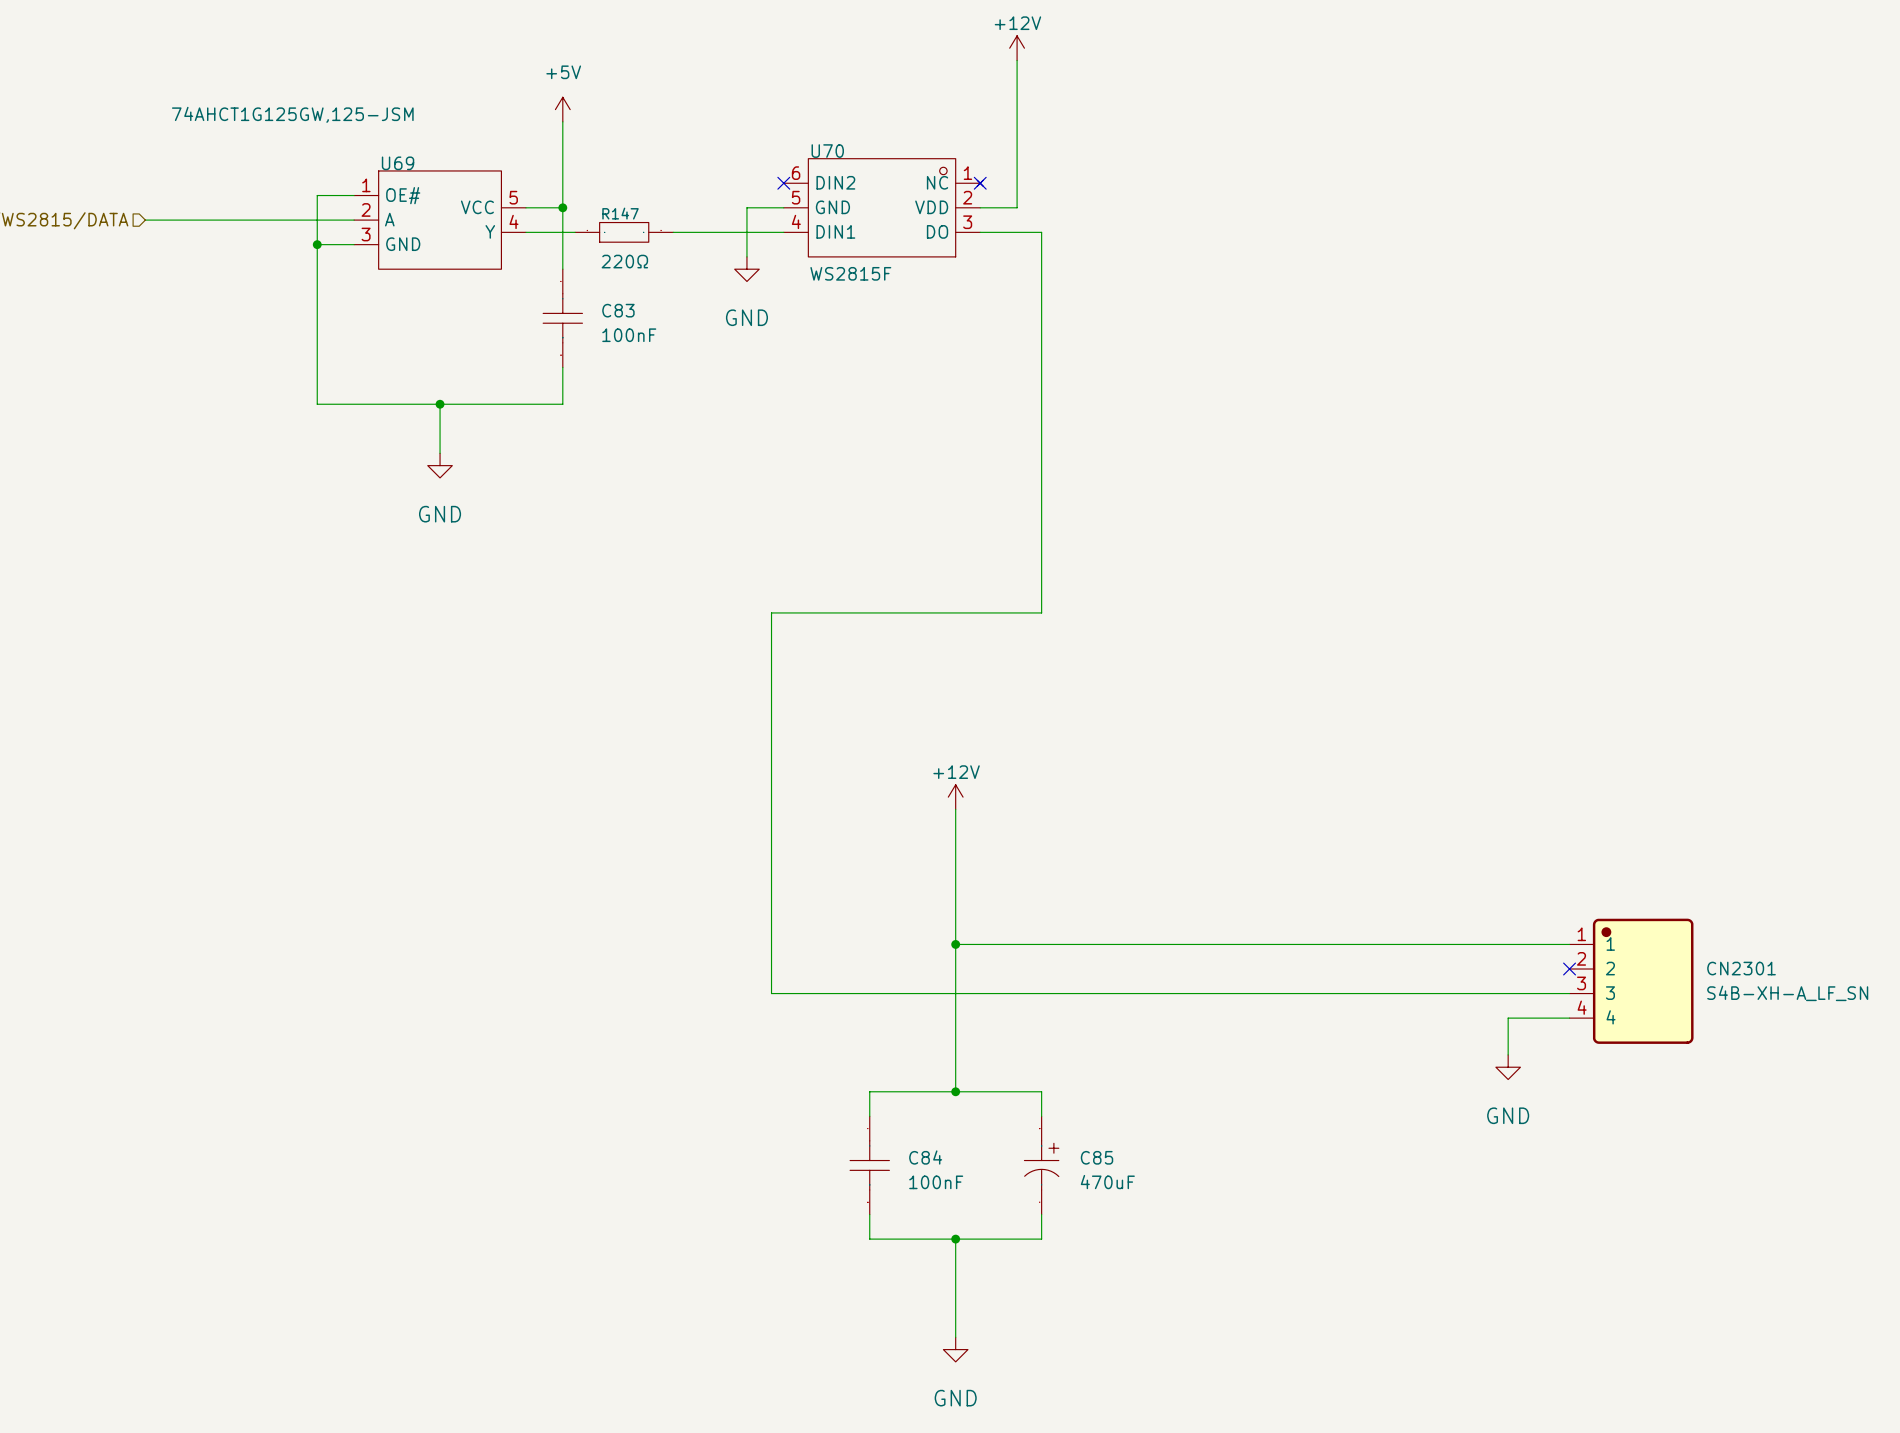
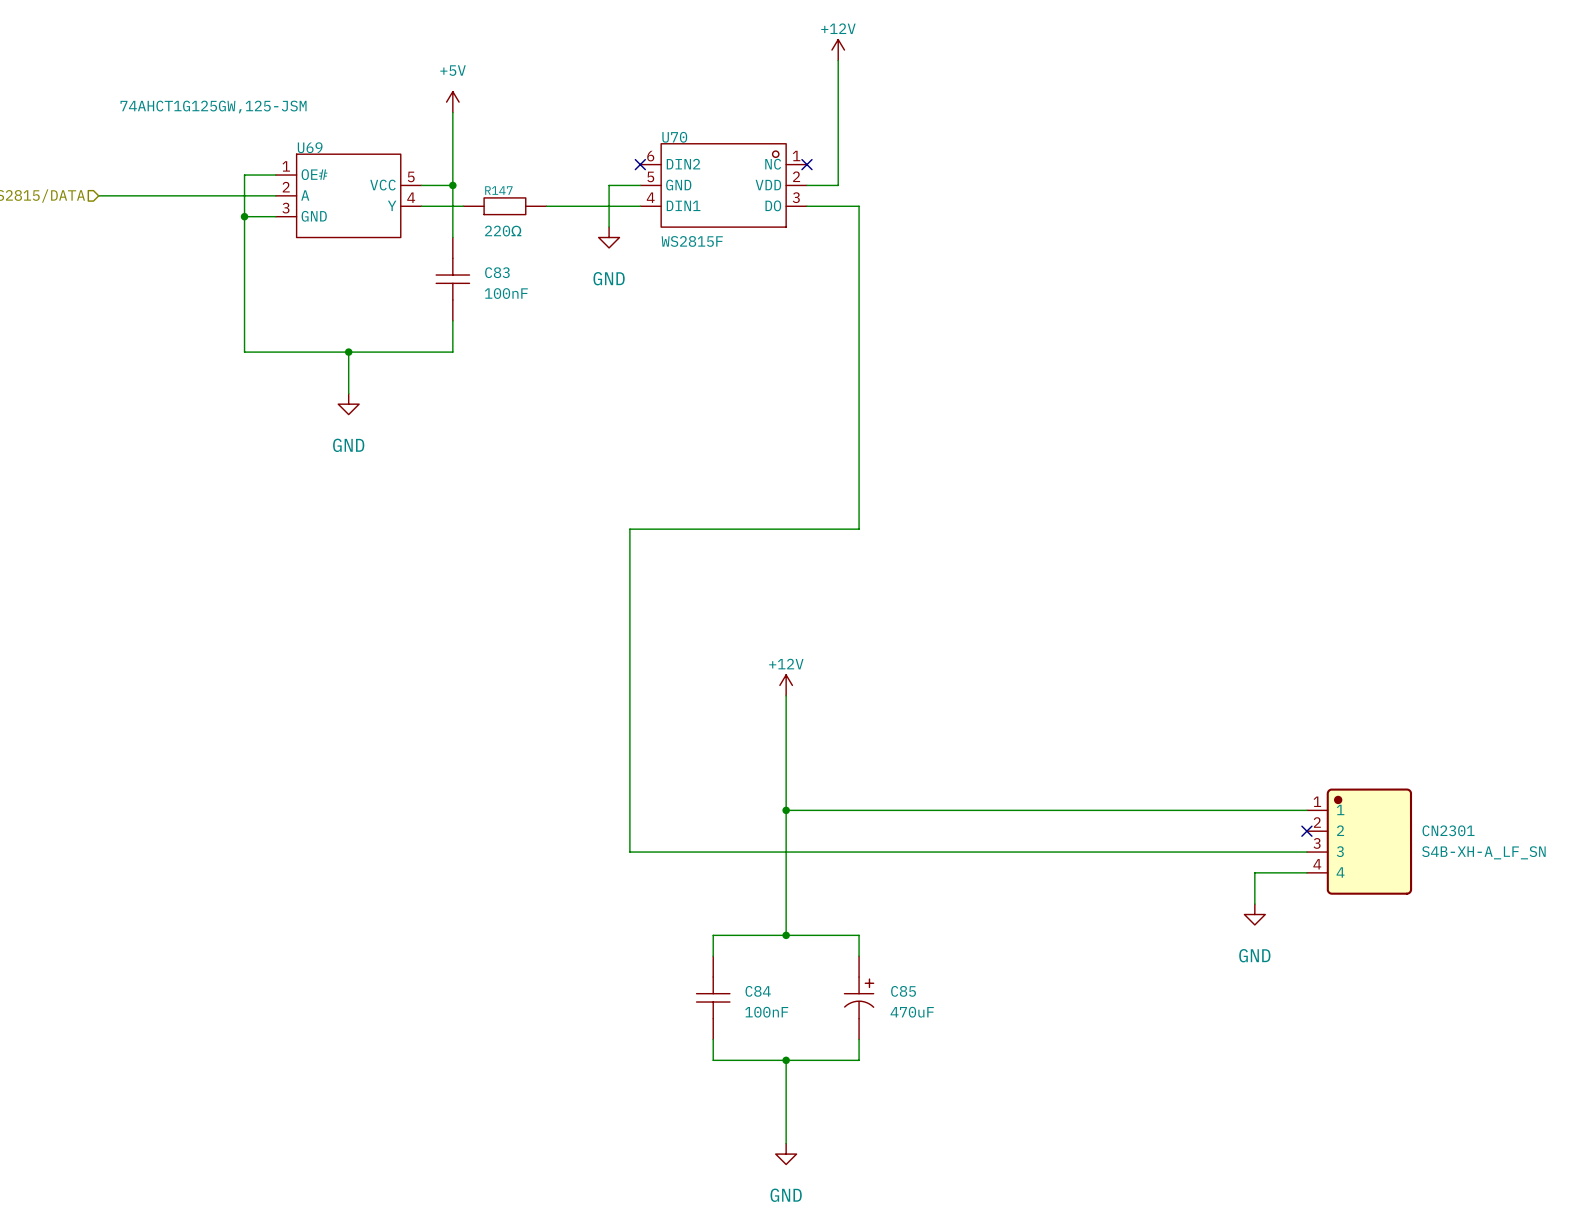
U70 symbol: [783, 158, 984, 257] -> [640, 143, 807, 228]

